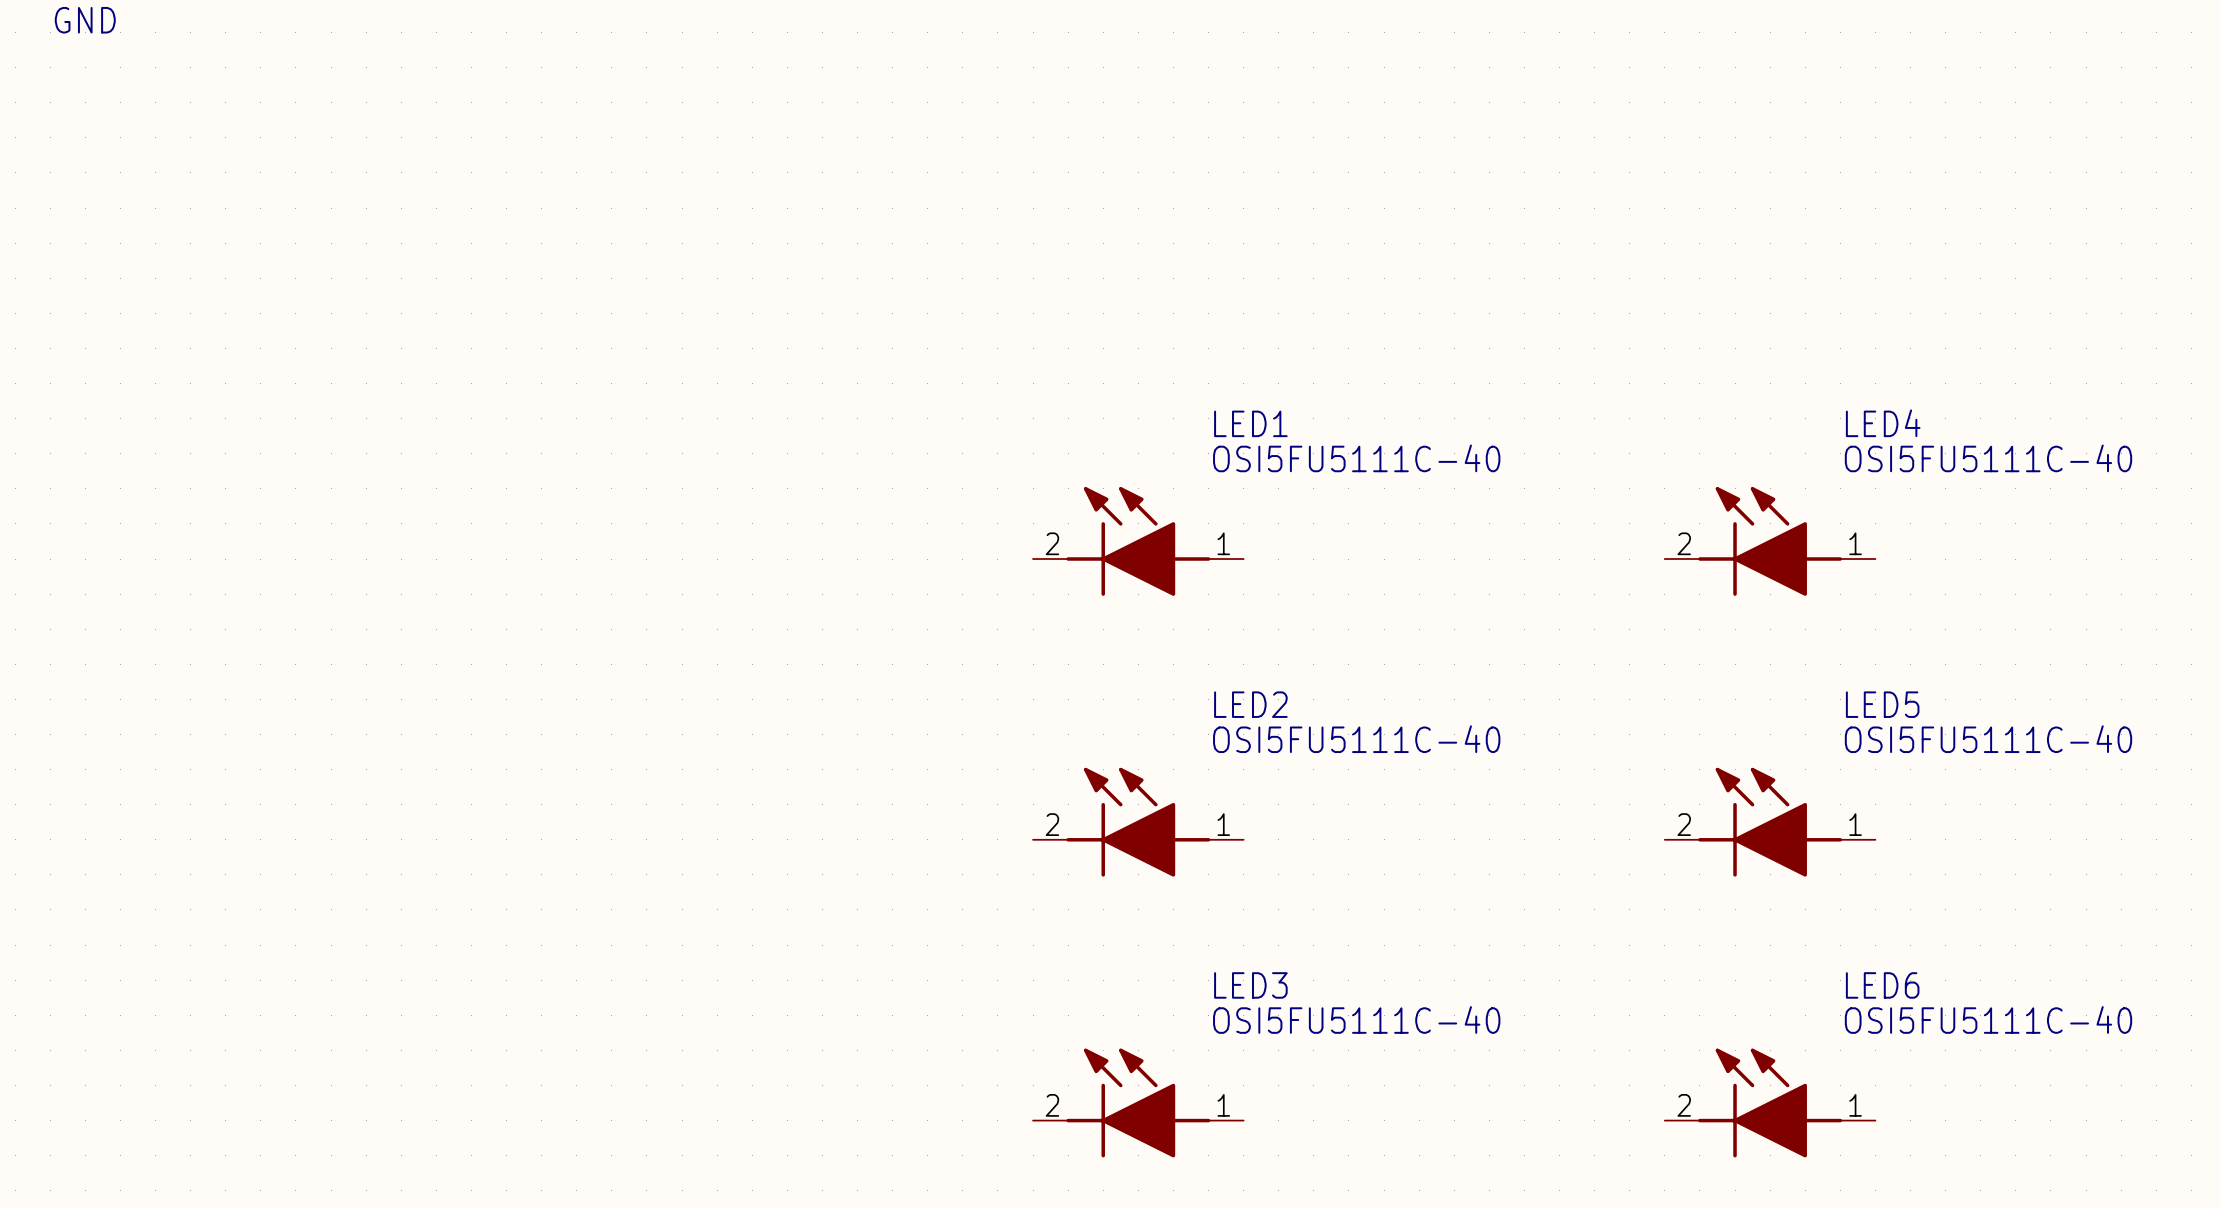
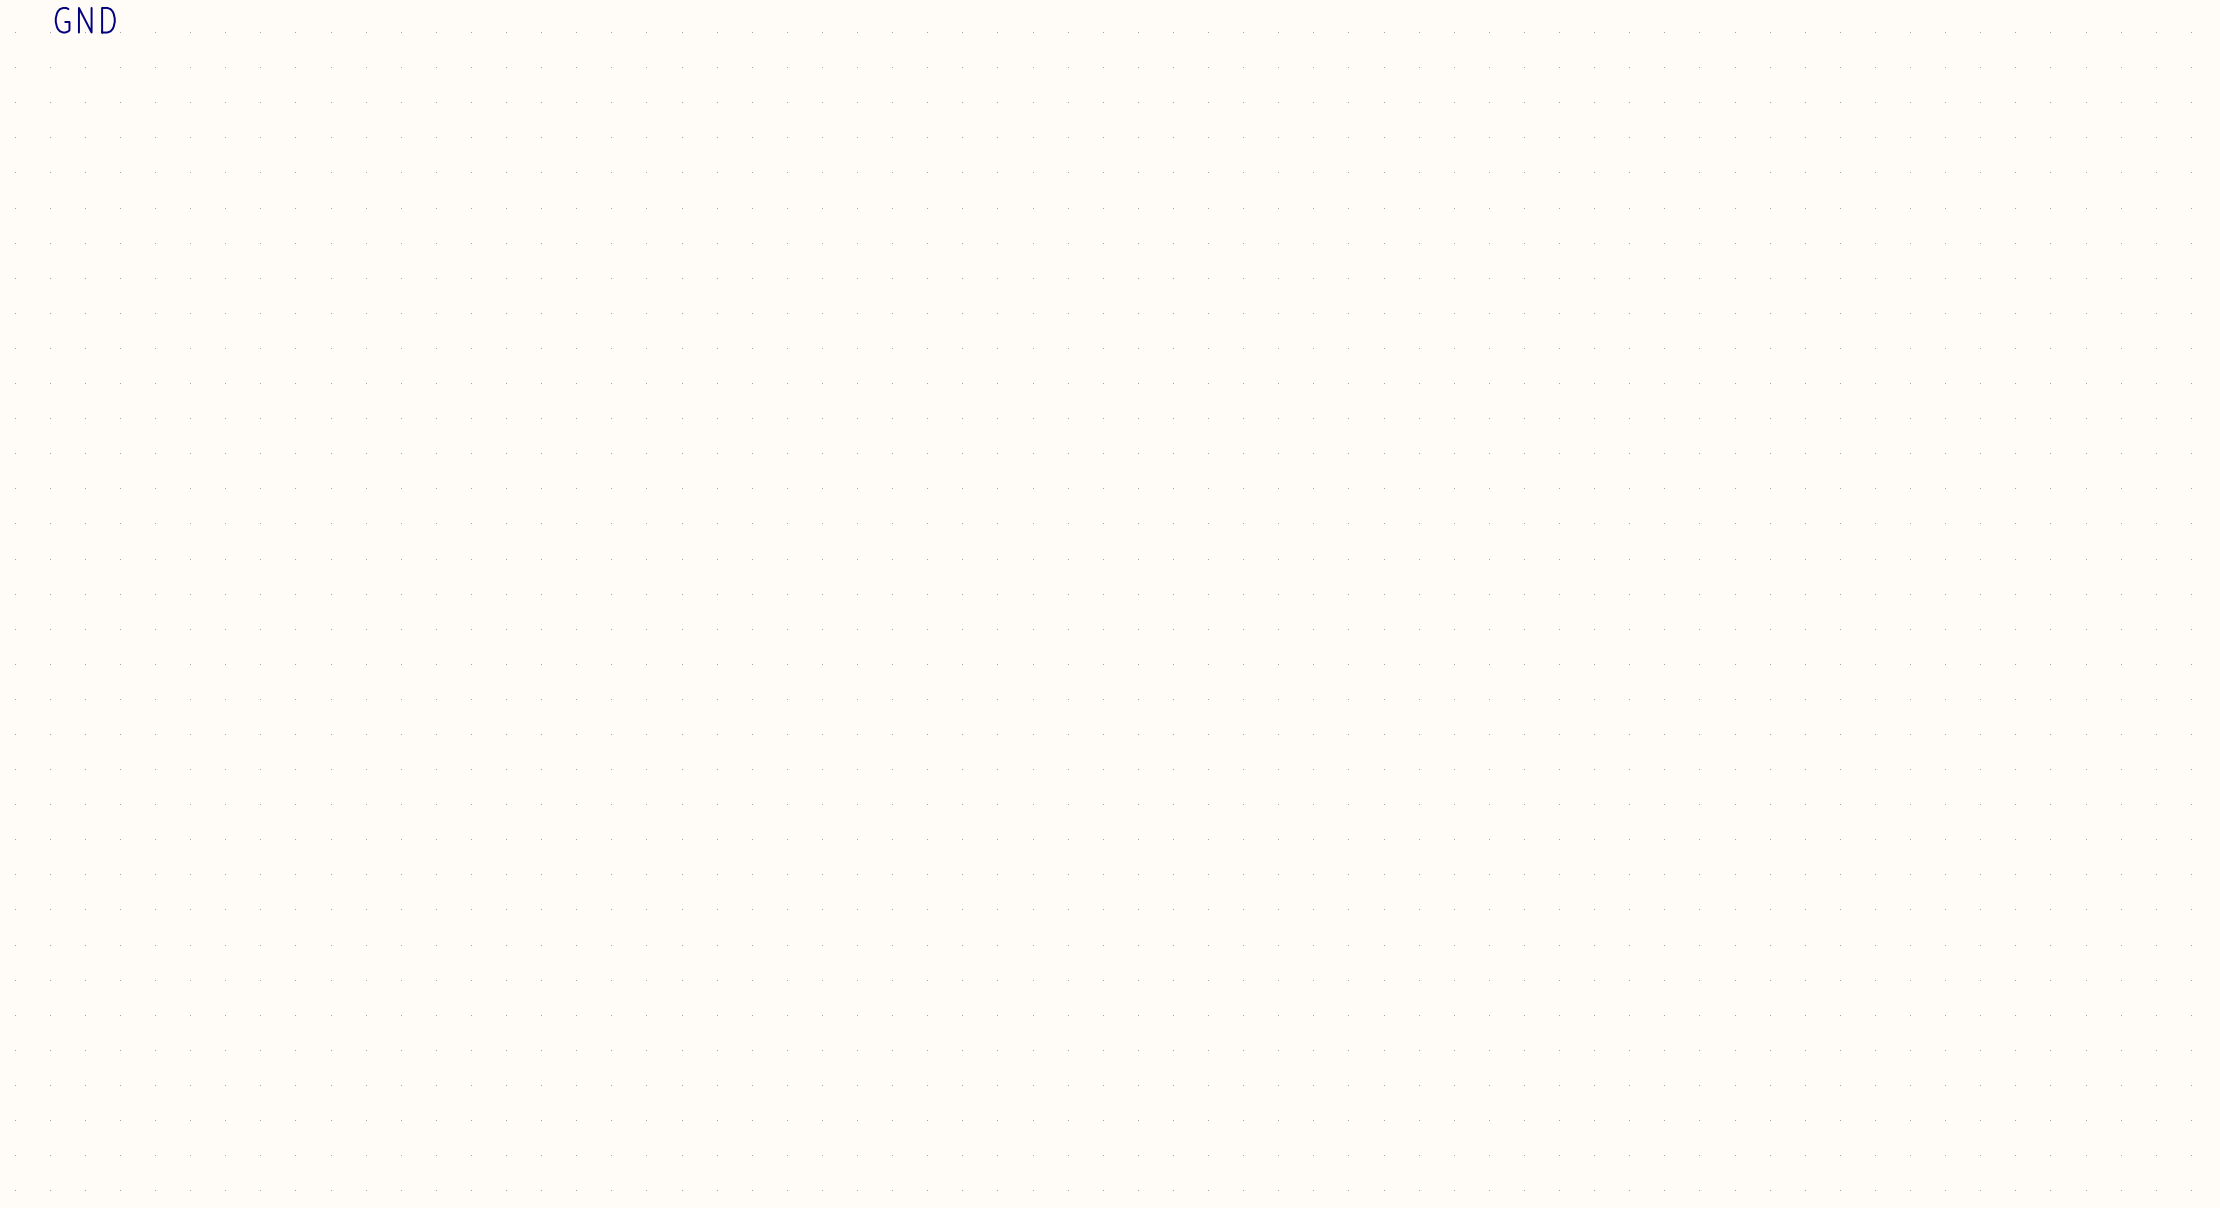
LED1: OSI5FU5111C-40 (1138, 541) -> none
LED4: OSI5FU5111C-40 (1770, 541) -> none
LED2: OSI5FU5111C-40 (1138, 822) -> none
LED5: OSI5FU5111C-40 (1770, 822) -> none
LED3: OSI5FU5111C-40 (1138, 1103) -> none
LED6: OSI5FU5111C-40 (1770, 1103) -> none

